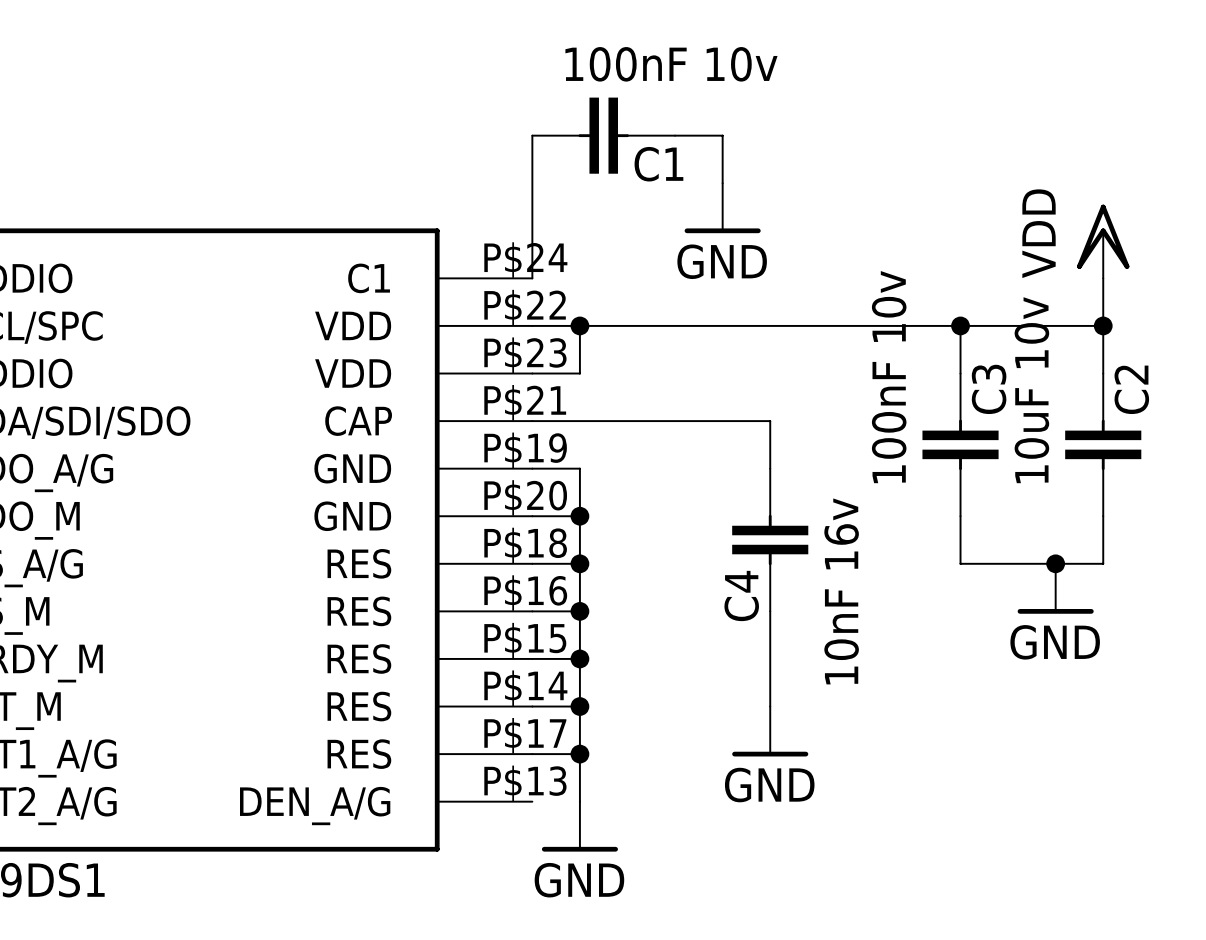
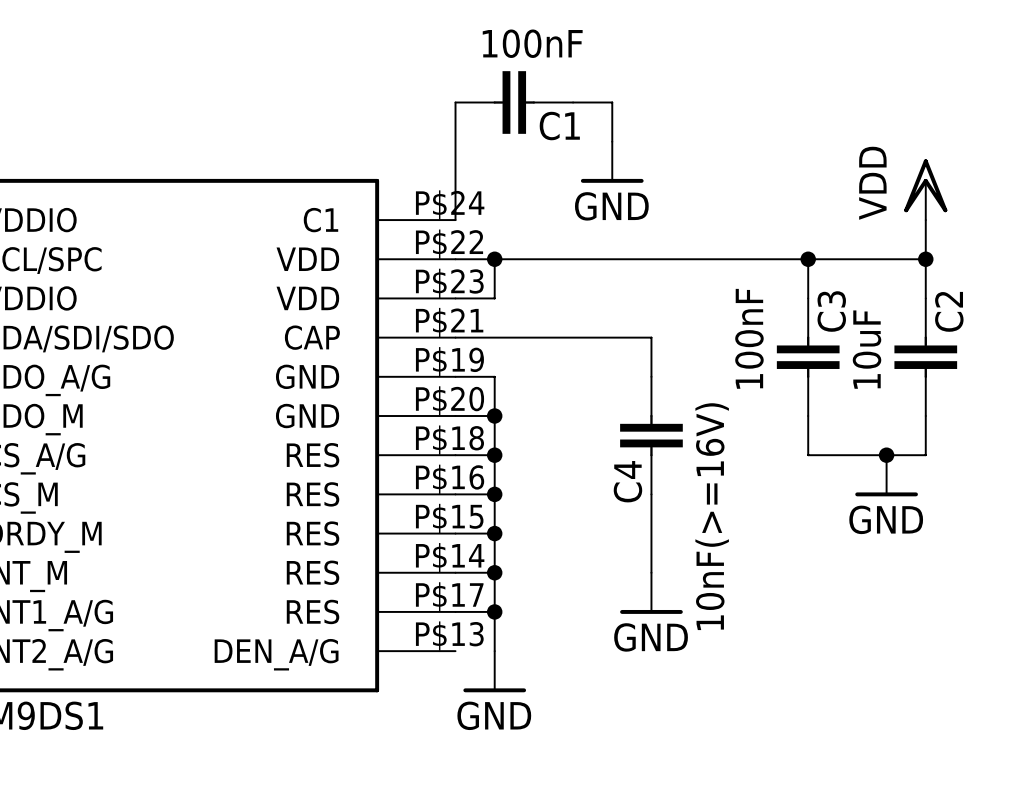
C1 value: 100nF 10v (671, 64) -> 100nF (532, 43)
C3 value: 100nF 10v (889, 377) -> 100nF (749, 338)
C2 value: 10uF 10v (1031, 390) -> 10uF (867, 349)
C4 value: 10nF 16v (841, 591) -> 10nF(>=16V) (712, 516)

